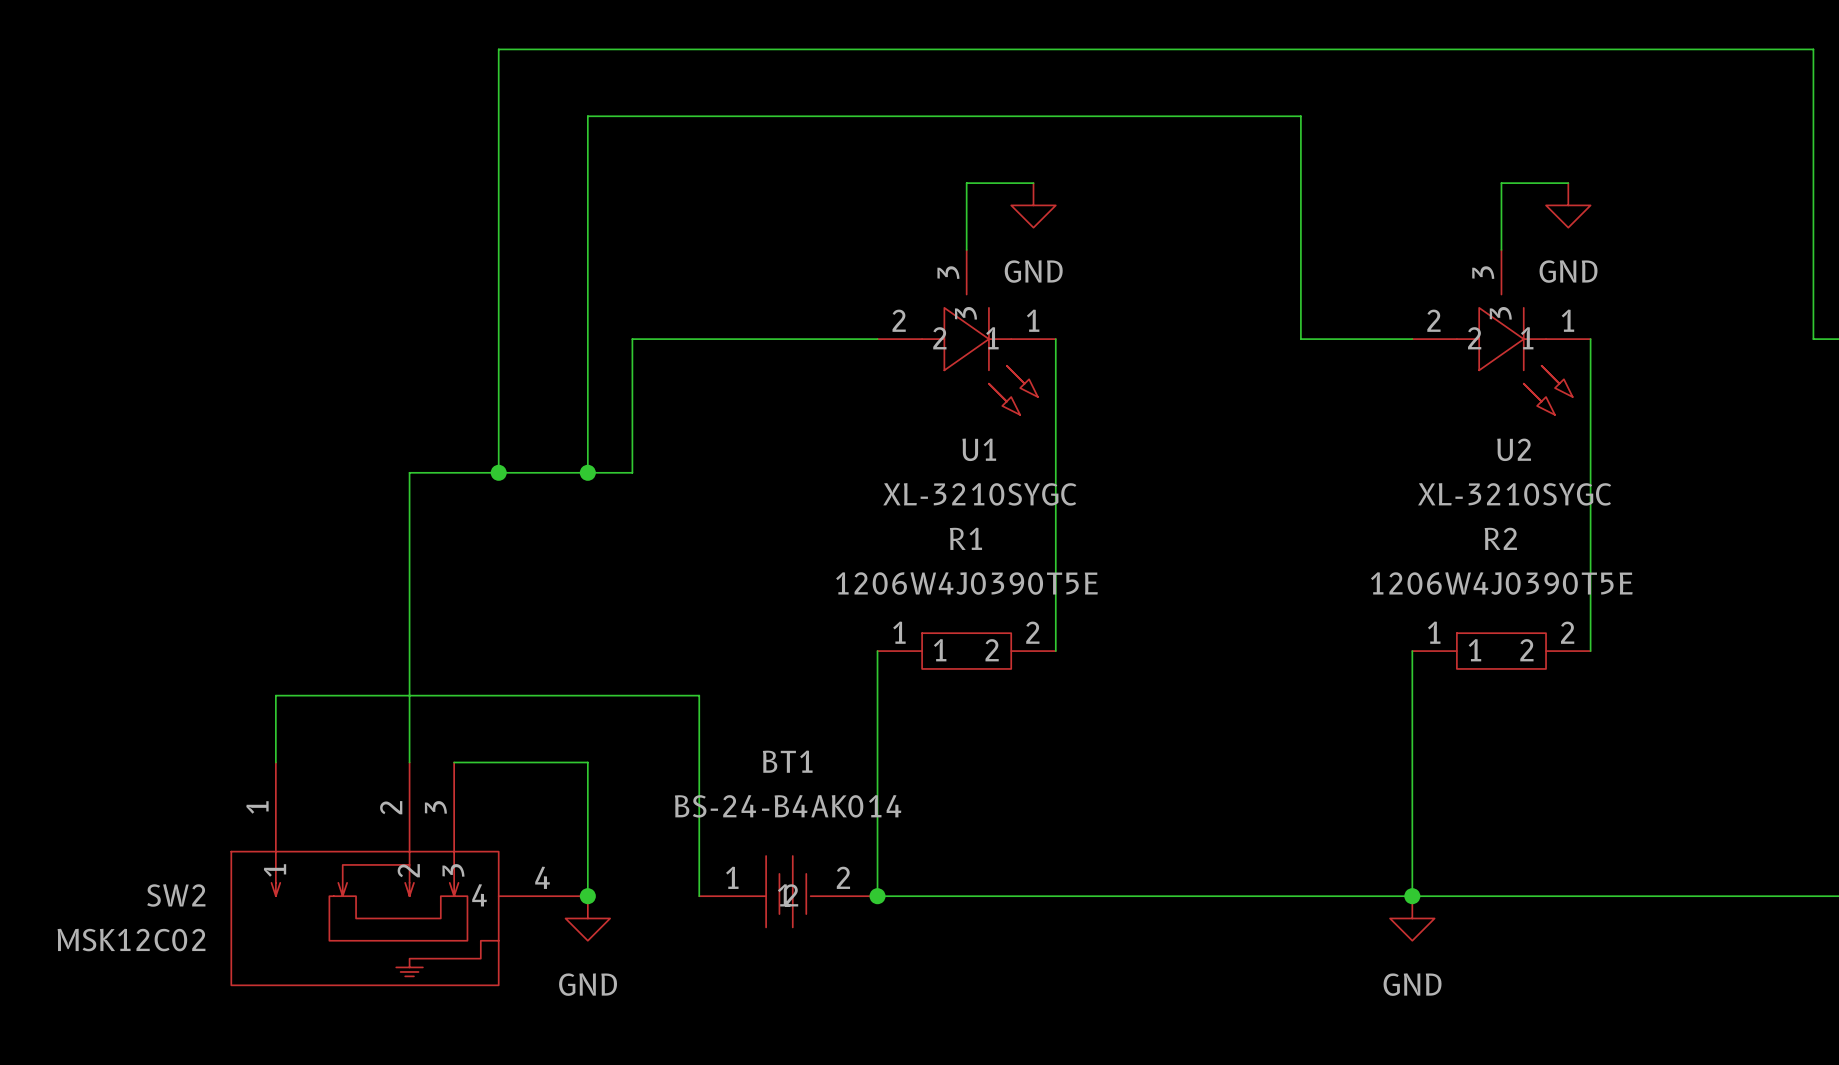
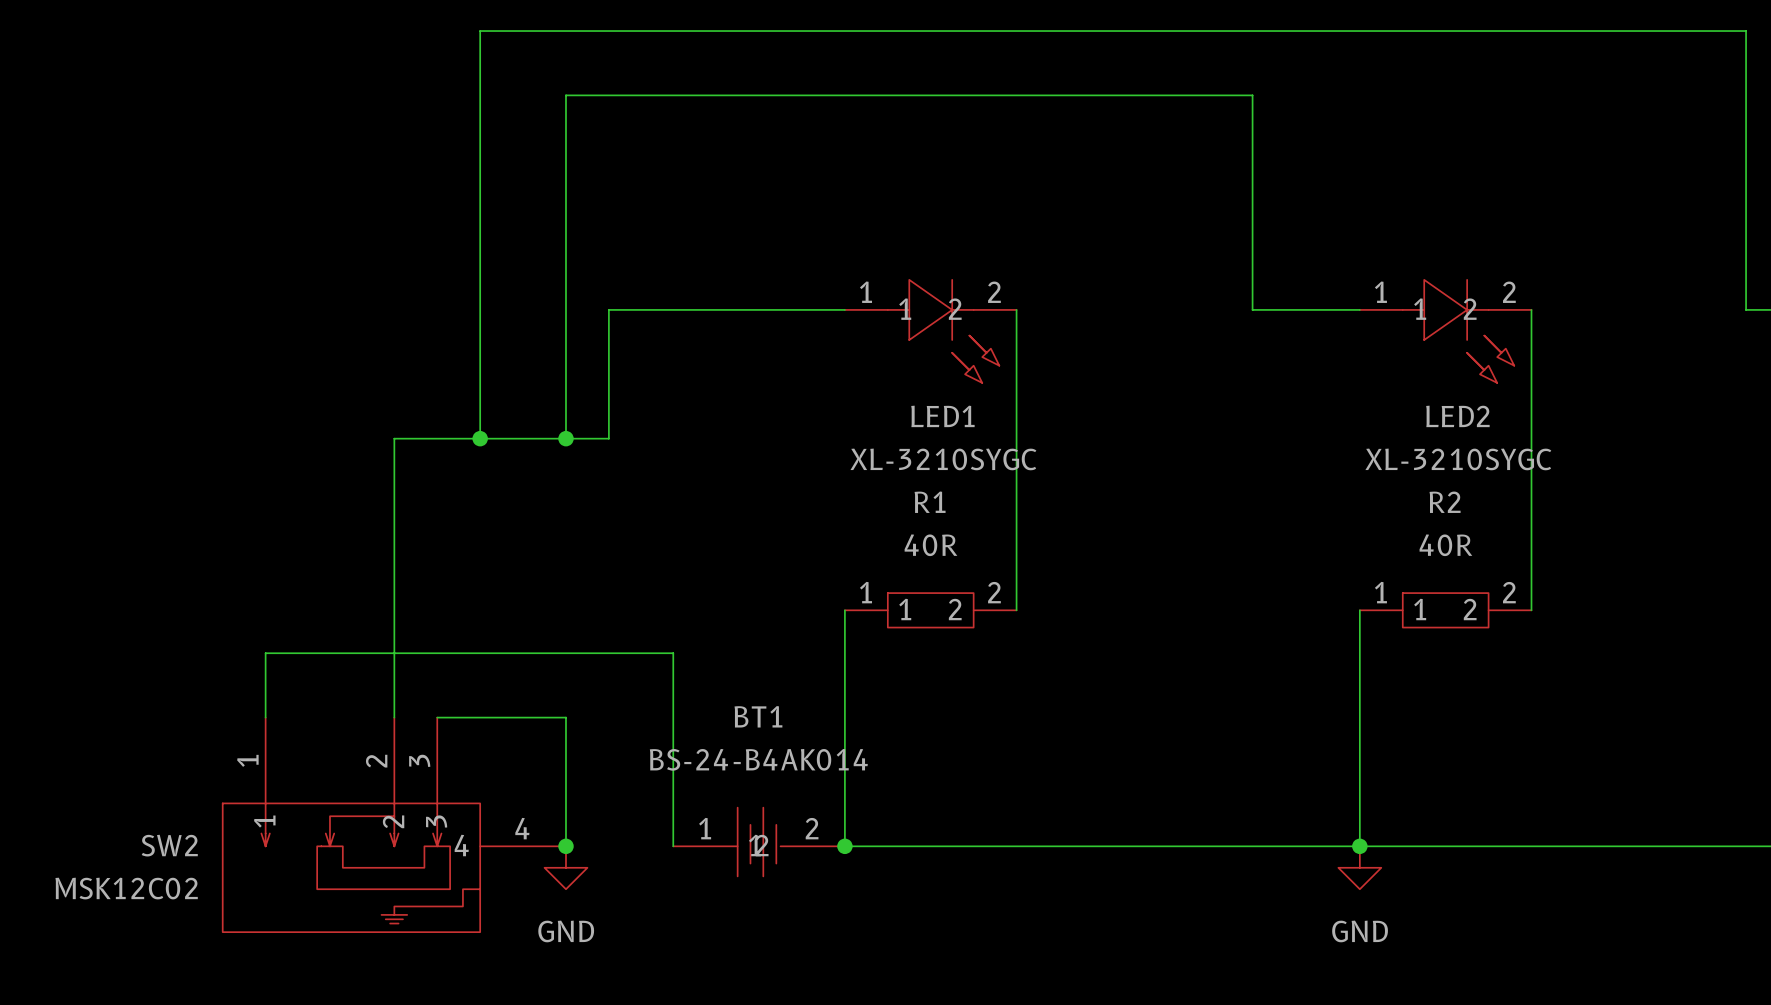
wire: (1033, 183) (966, 183) (966, 249) -> none
wire: (1568, 183) (1501, 183) (1501, 249) -> none
power symbol: GND (1033, 205) -> none
power symbol: GND (1568, 205) -> none
U1: XL-3210SYGC (966, 332) -> none
U2: XL-3210SYGC (1501, 332) -> none
LED1: none -> XL-3210SYGC (930, 331)
LED2: none -> XL-3210SYGC (1445, 331)
R1 value: 1206W4J0390T5E (966, 583) -> 40R (930, 545)
R2 value: 1206W4J0390T5E (1501, 583) -> 40R (1445, 545)

